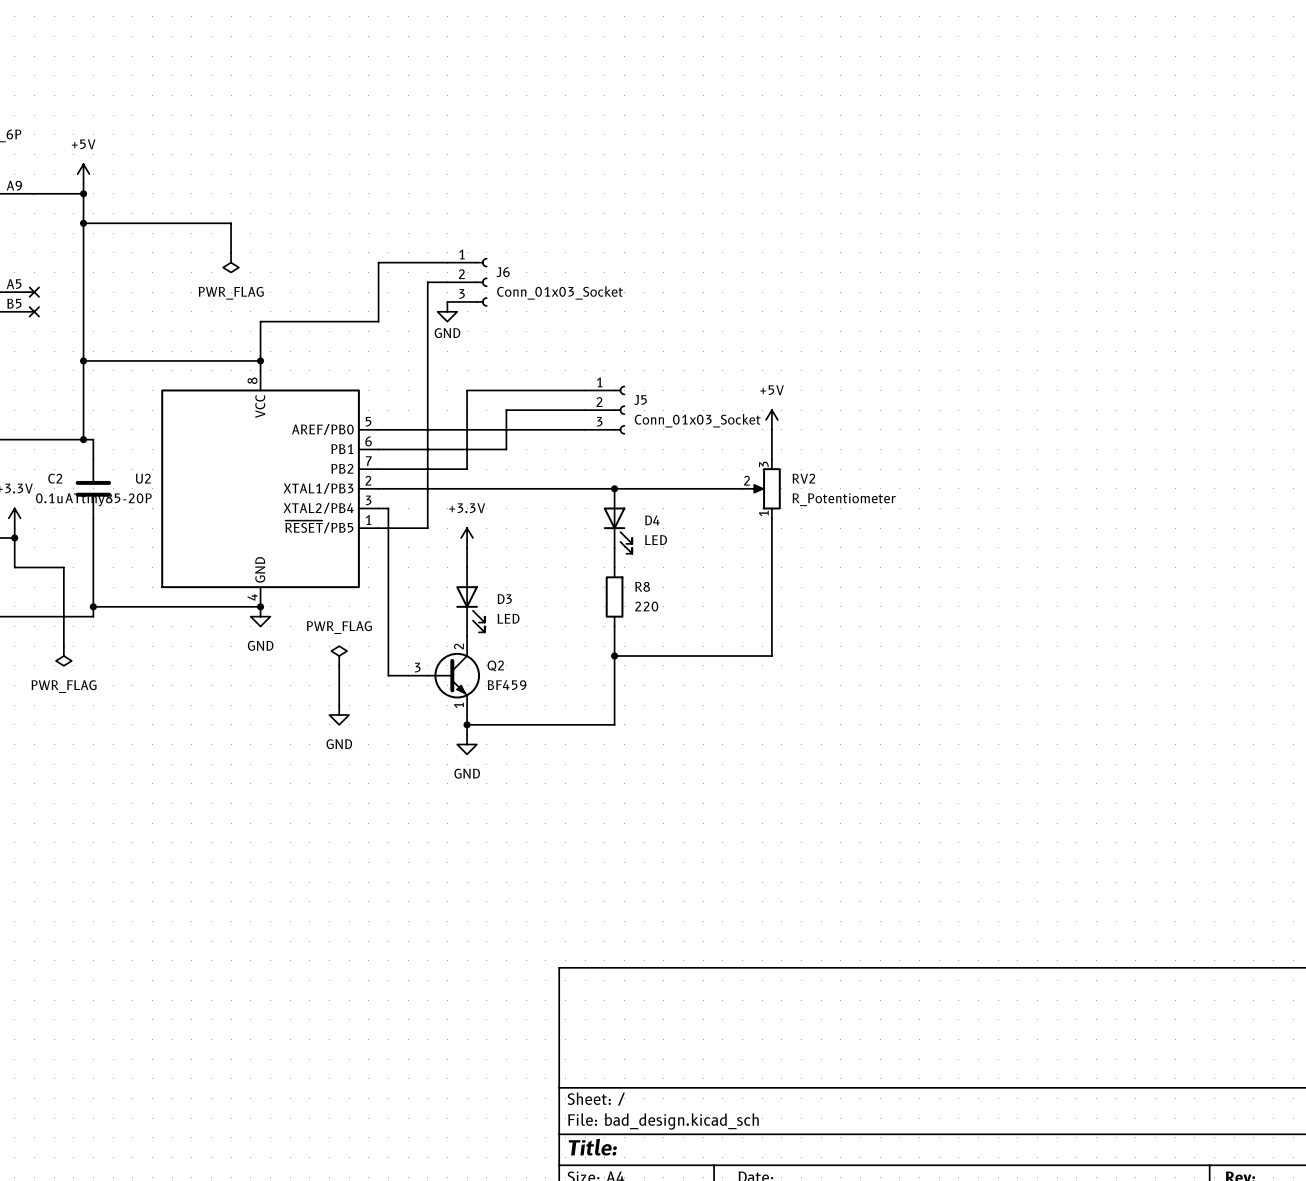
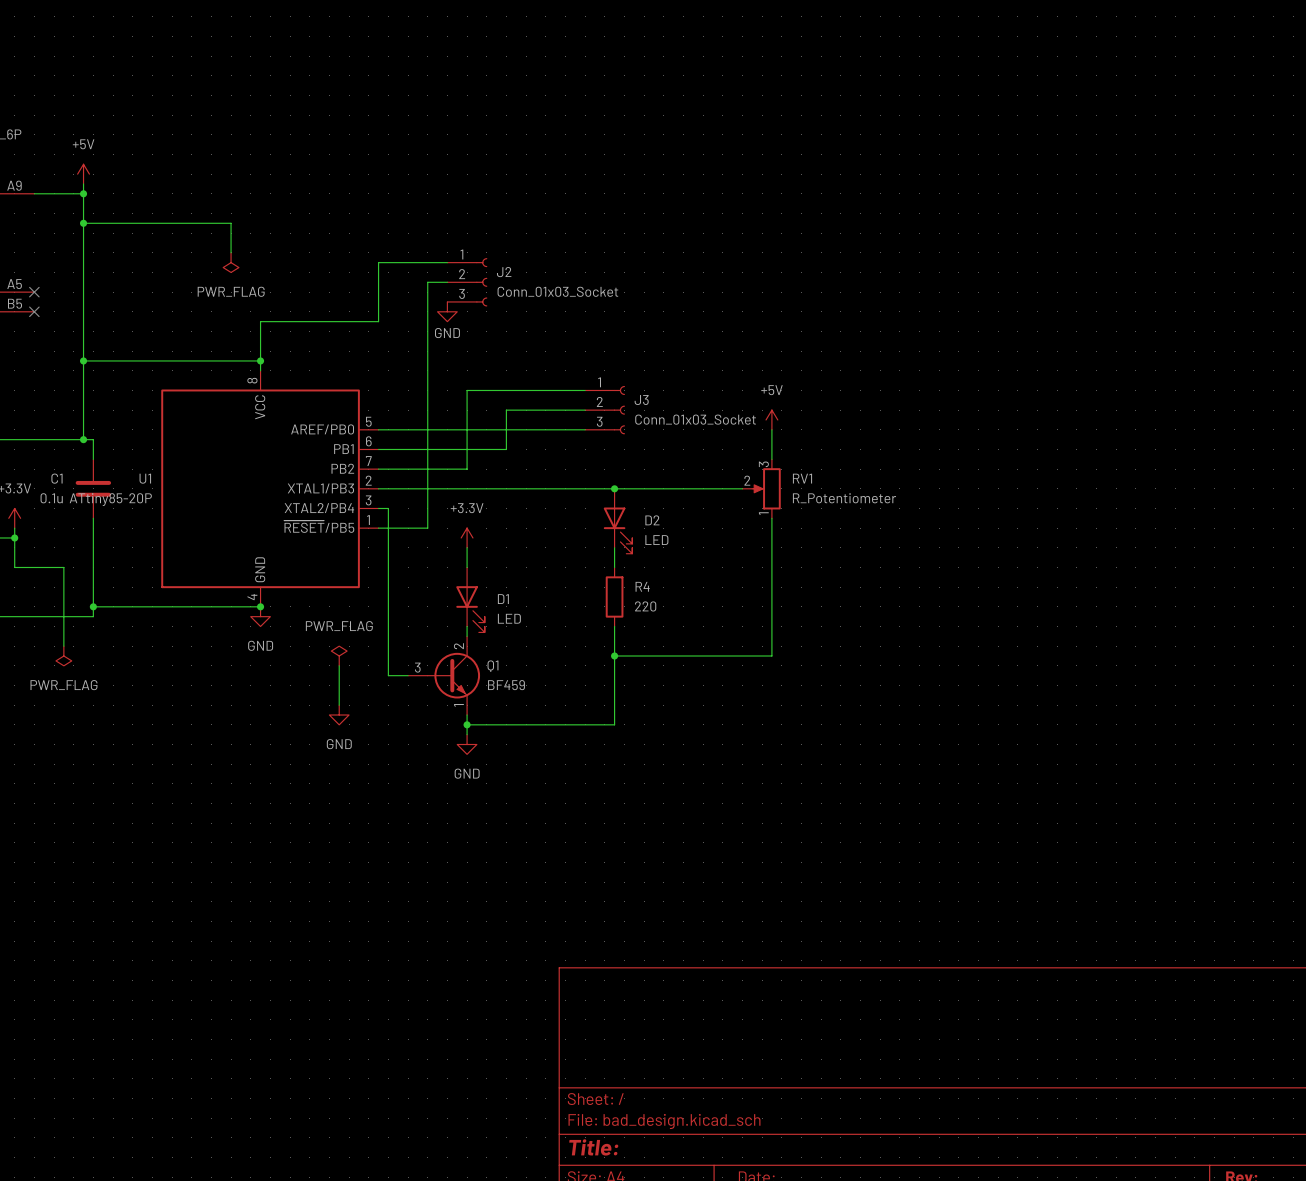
J6 name: J6 (503, 272) -> J2 (504, 272)
J5 name: J5 (640, 399) -> J3 (641, 400)
C2 name: C2 (55, 478) -> C1 (57, 478)
U2 name: U2 (143, 478) -> U1 (145, 478)
RV2 name: RV2 (803, 478) -> RV1 (802, 478)
D4 name: D4 (652, 520) -> D2 (652, 520)
R8 name: R8 (642, 586) -> R4 (642, 586)
D3 name: D3 (504, 599) -> D1 (503, 599)
Q2 name: Q2 (495, 665) -> Q1 (492, 666)

